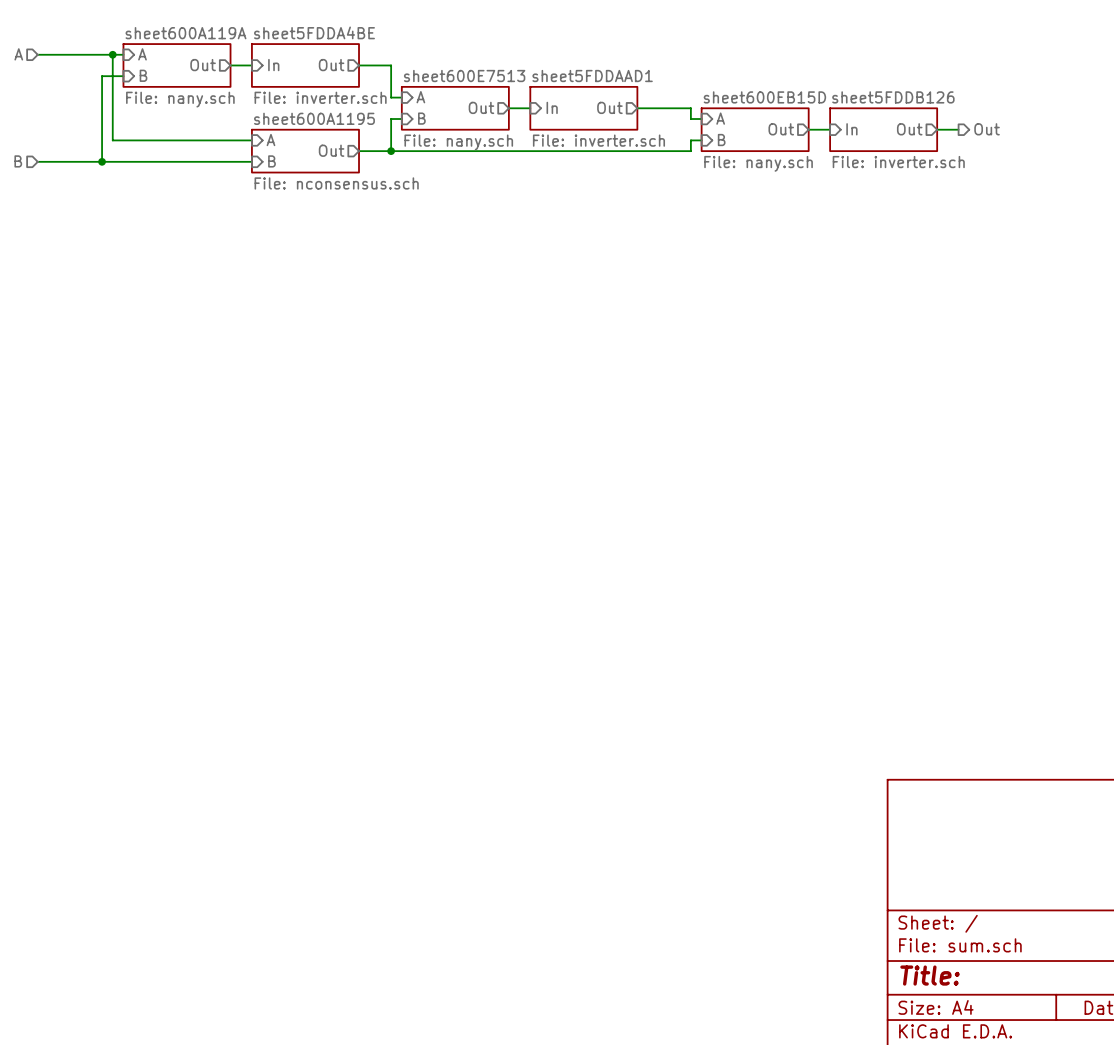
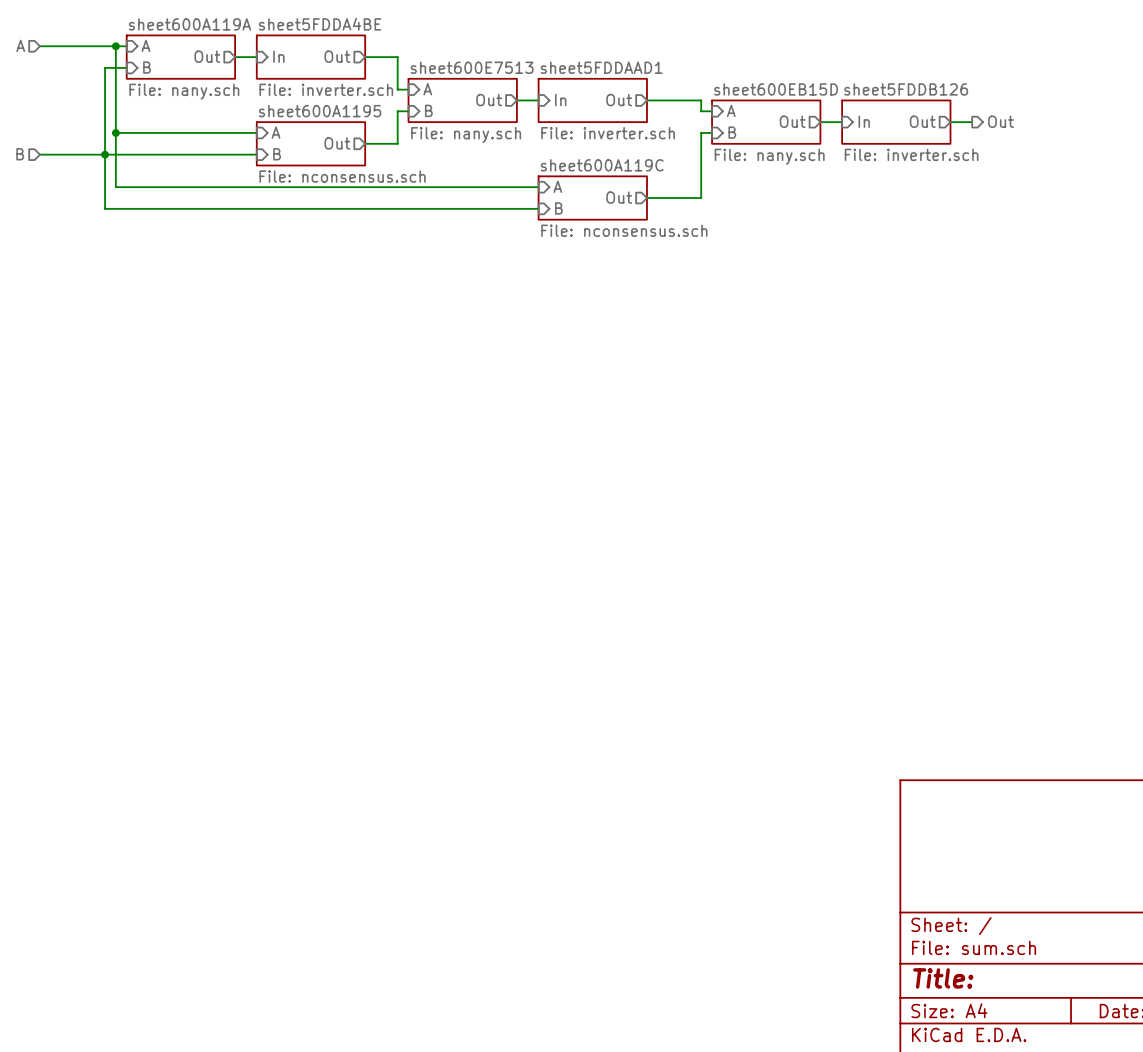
wire: none -> (115, 132) (115, 187) (538, 187)
junction: none -> (115, 132)
wire: (391, 151) (690, 151) -> (646, 198) (701, 198) (701, 143)
junction: (391, 151) -> none
wire: none -> (105, 154) (105, 208) (538, 208)
sheet pin: none -> A (557, 186)
sheet sheet600A119C: none -> File: nconsensus.sch (592, 198)
sheet pin: none -> Out (619, 197)
sheet pin: none -> B (558, 208)

